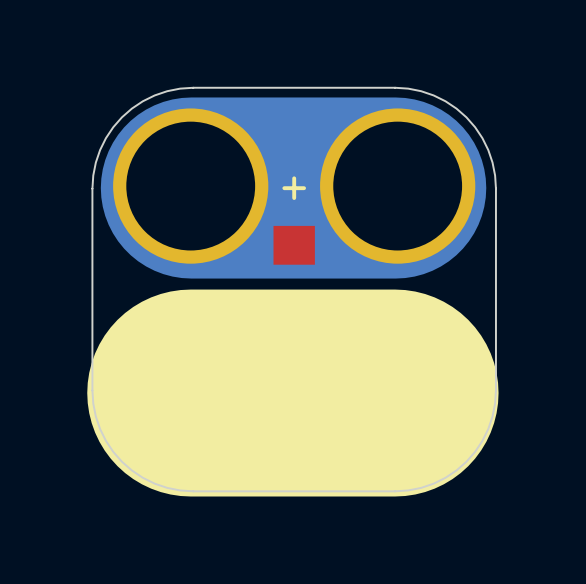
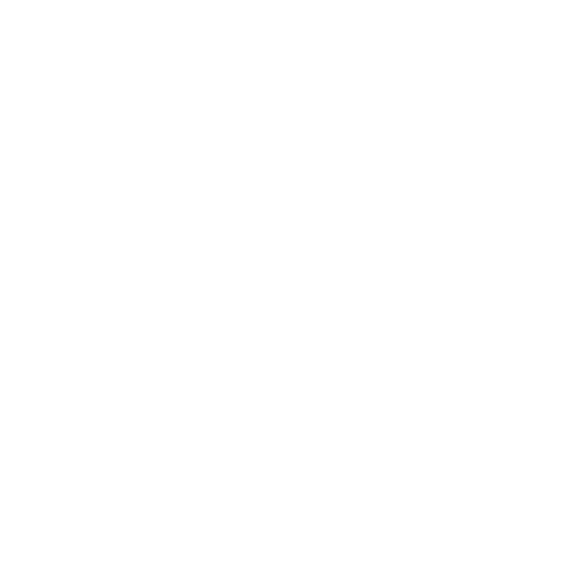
part: (292, 291) -> none

